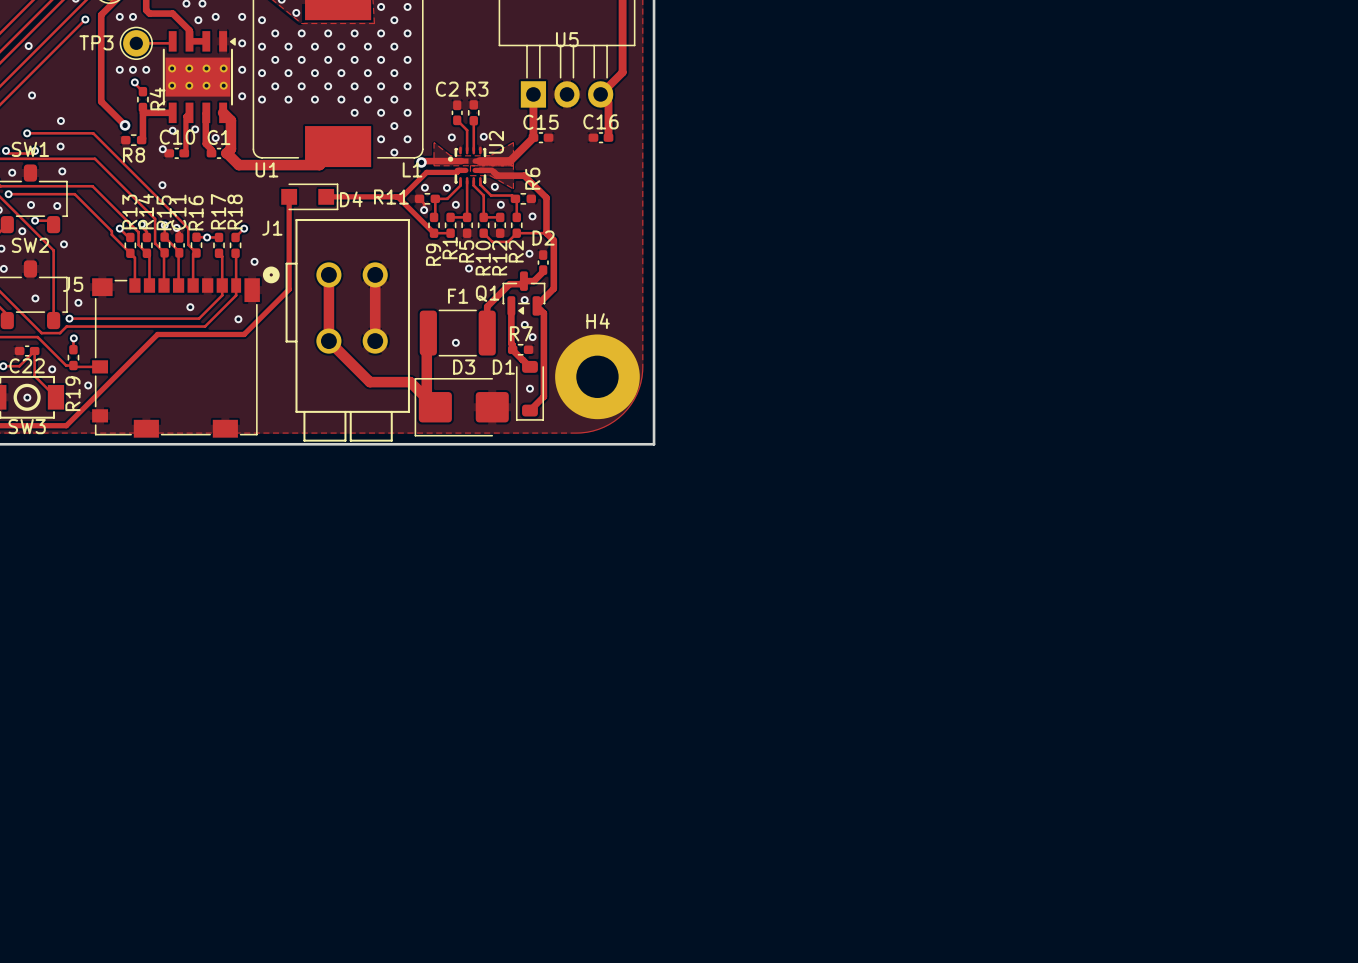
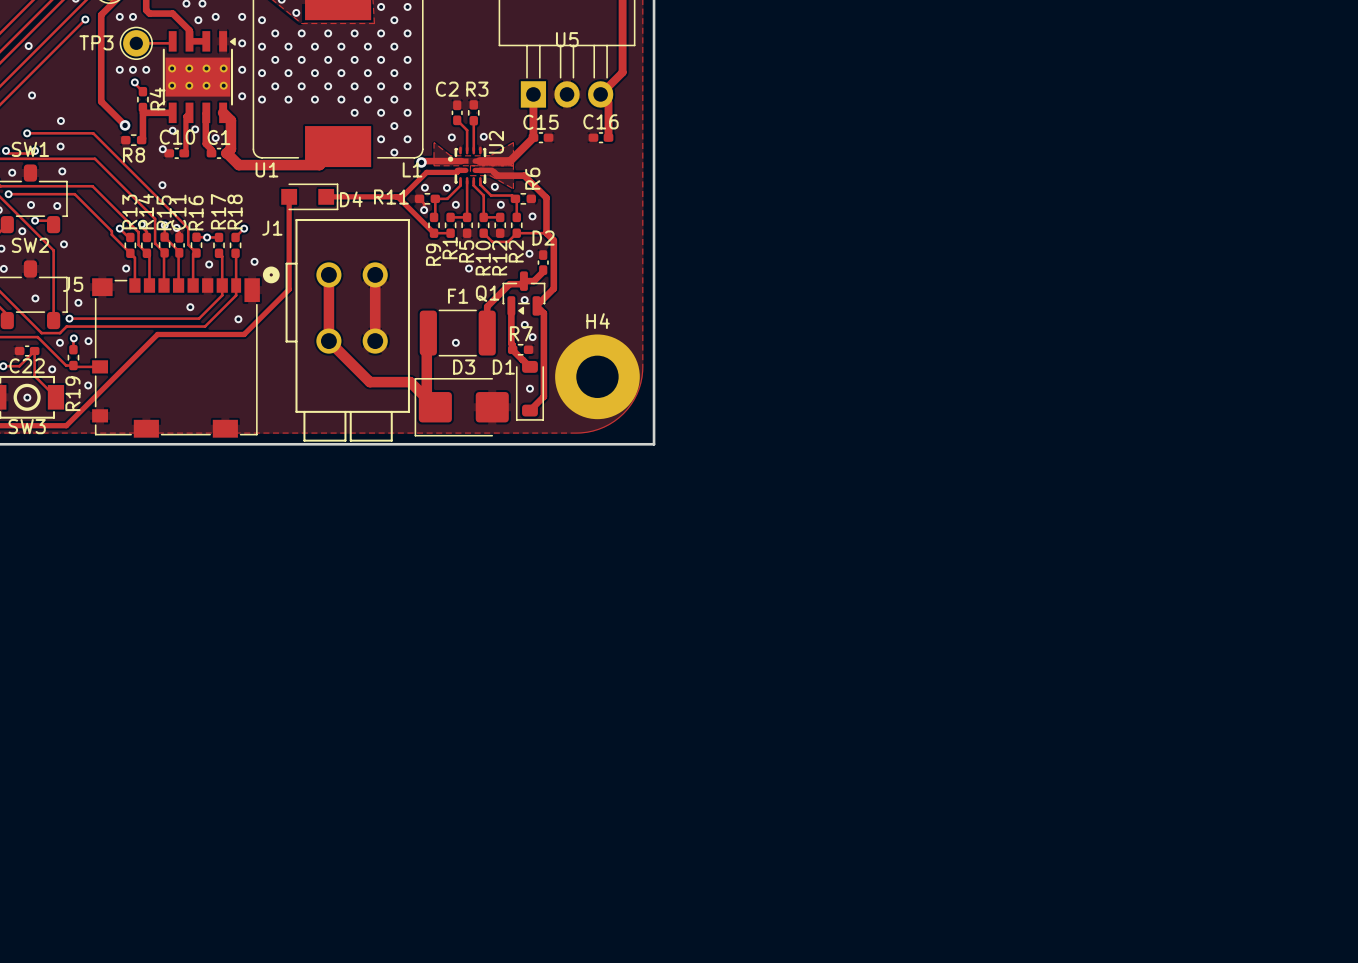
via: none -> (209, 264)
via: none -> (126, 268)
via: none -> (88, 341)
via: none -> (59, 342)

